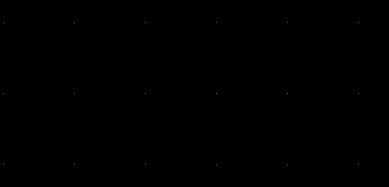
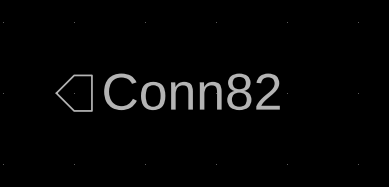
hierarchical label: none -> Conn82 (191, 91)

